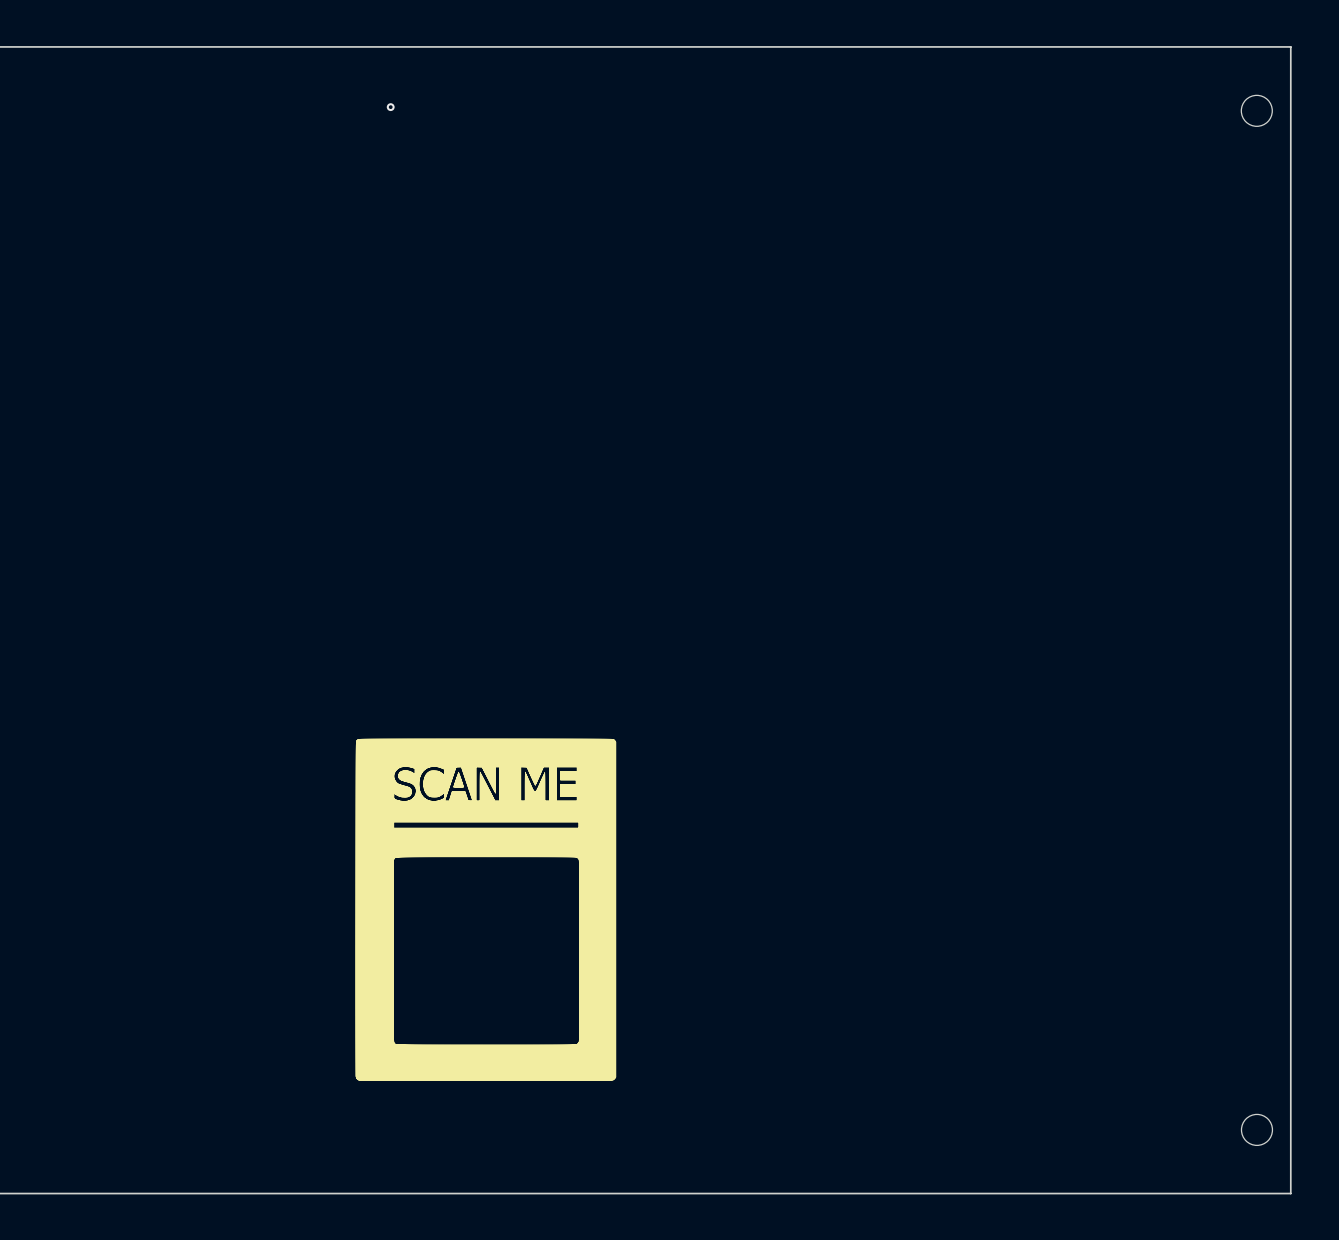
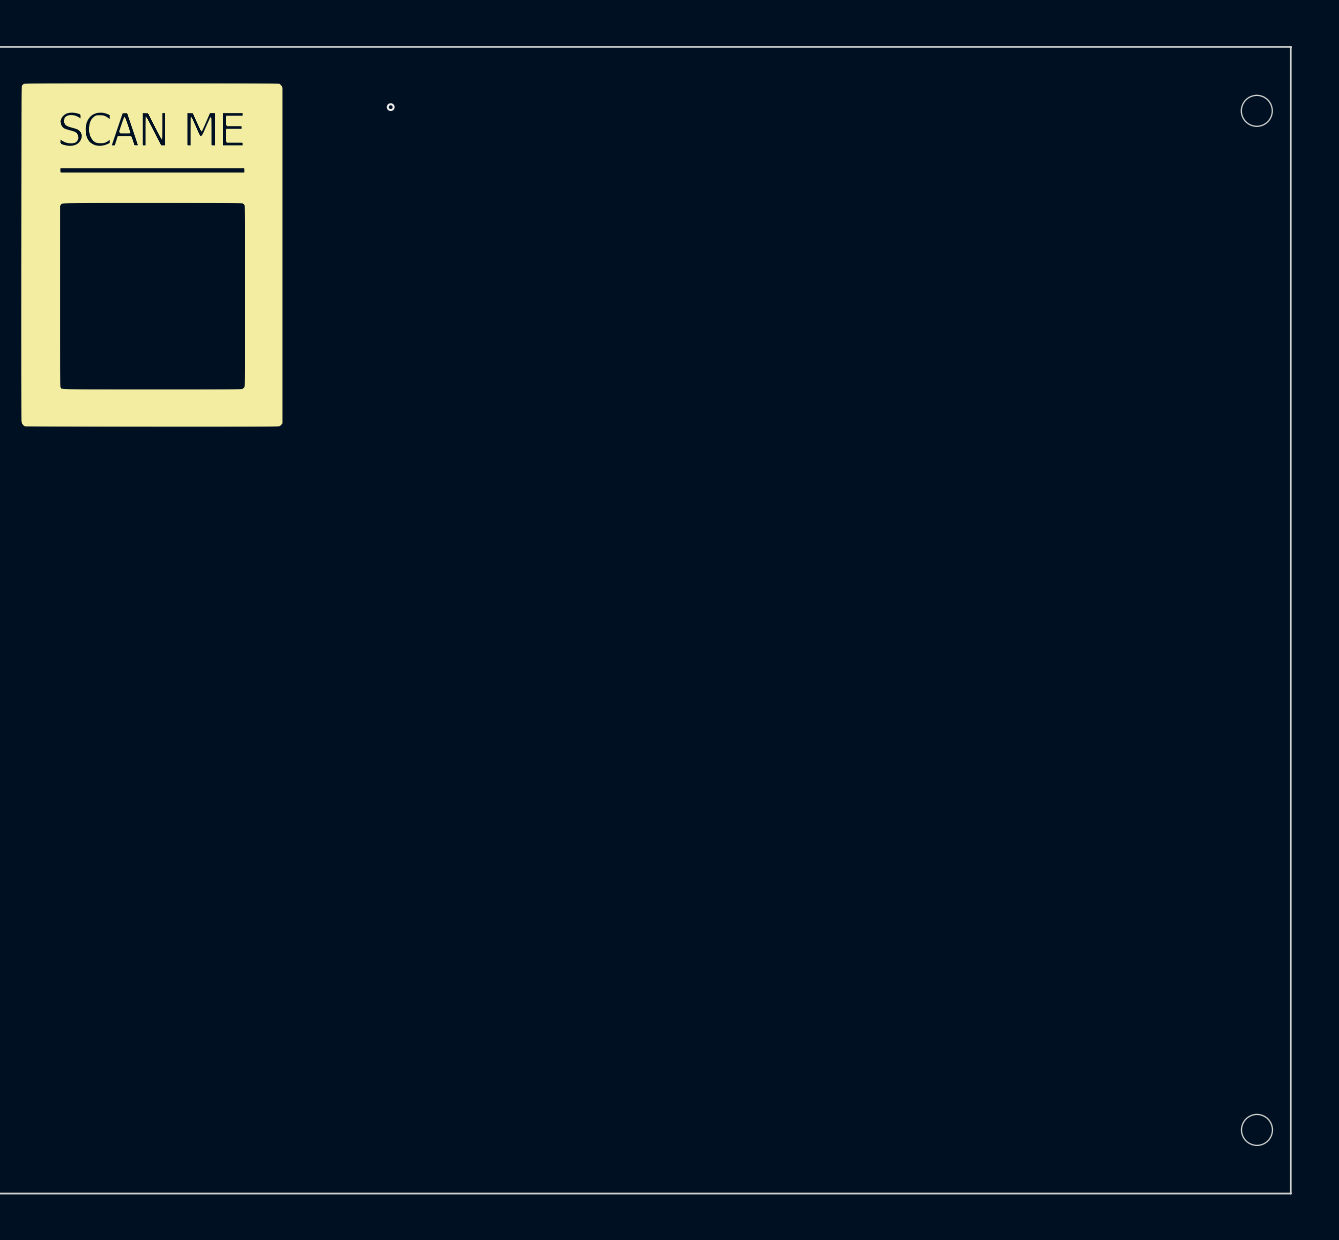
drawing: none -> [21, 83, 283, 427]
drawing: [355, 738, 617, 1081] -> none

